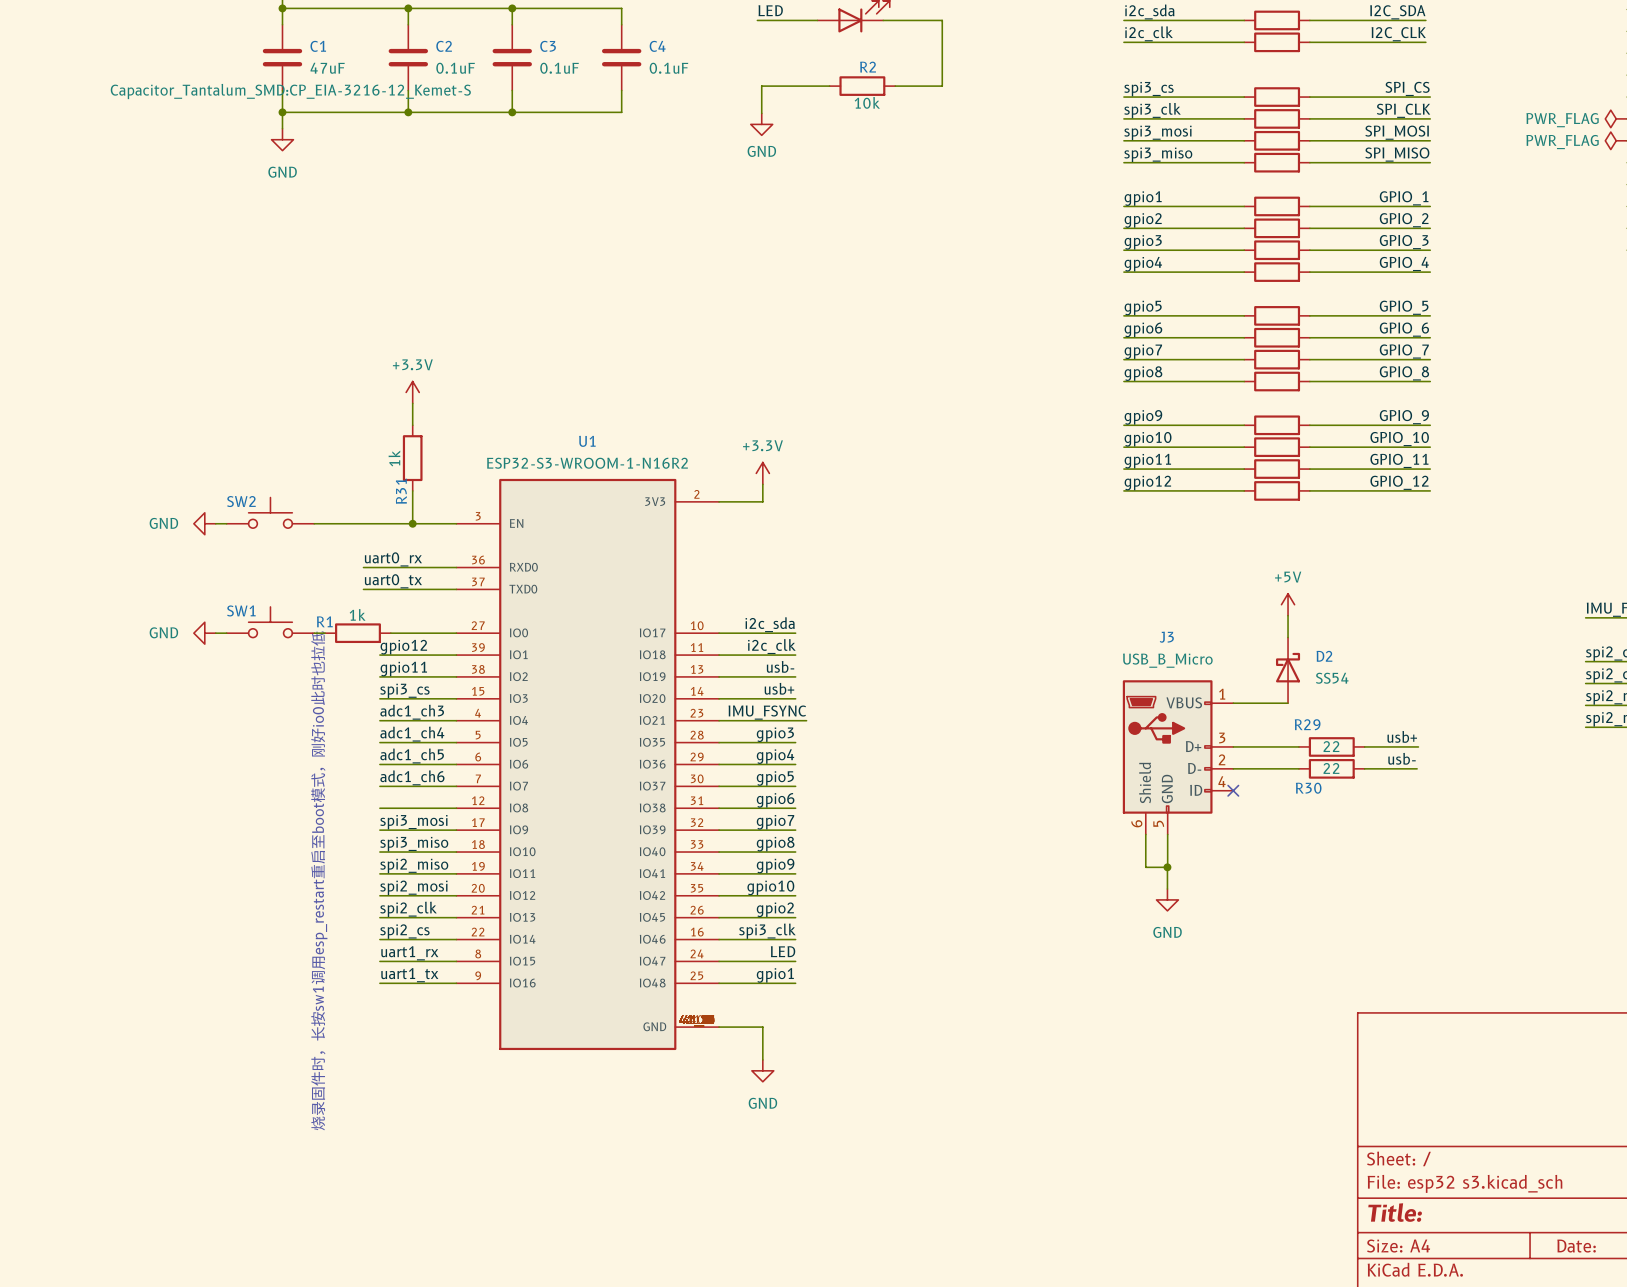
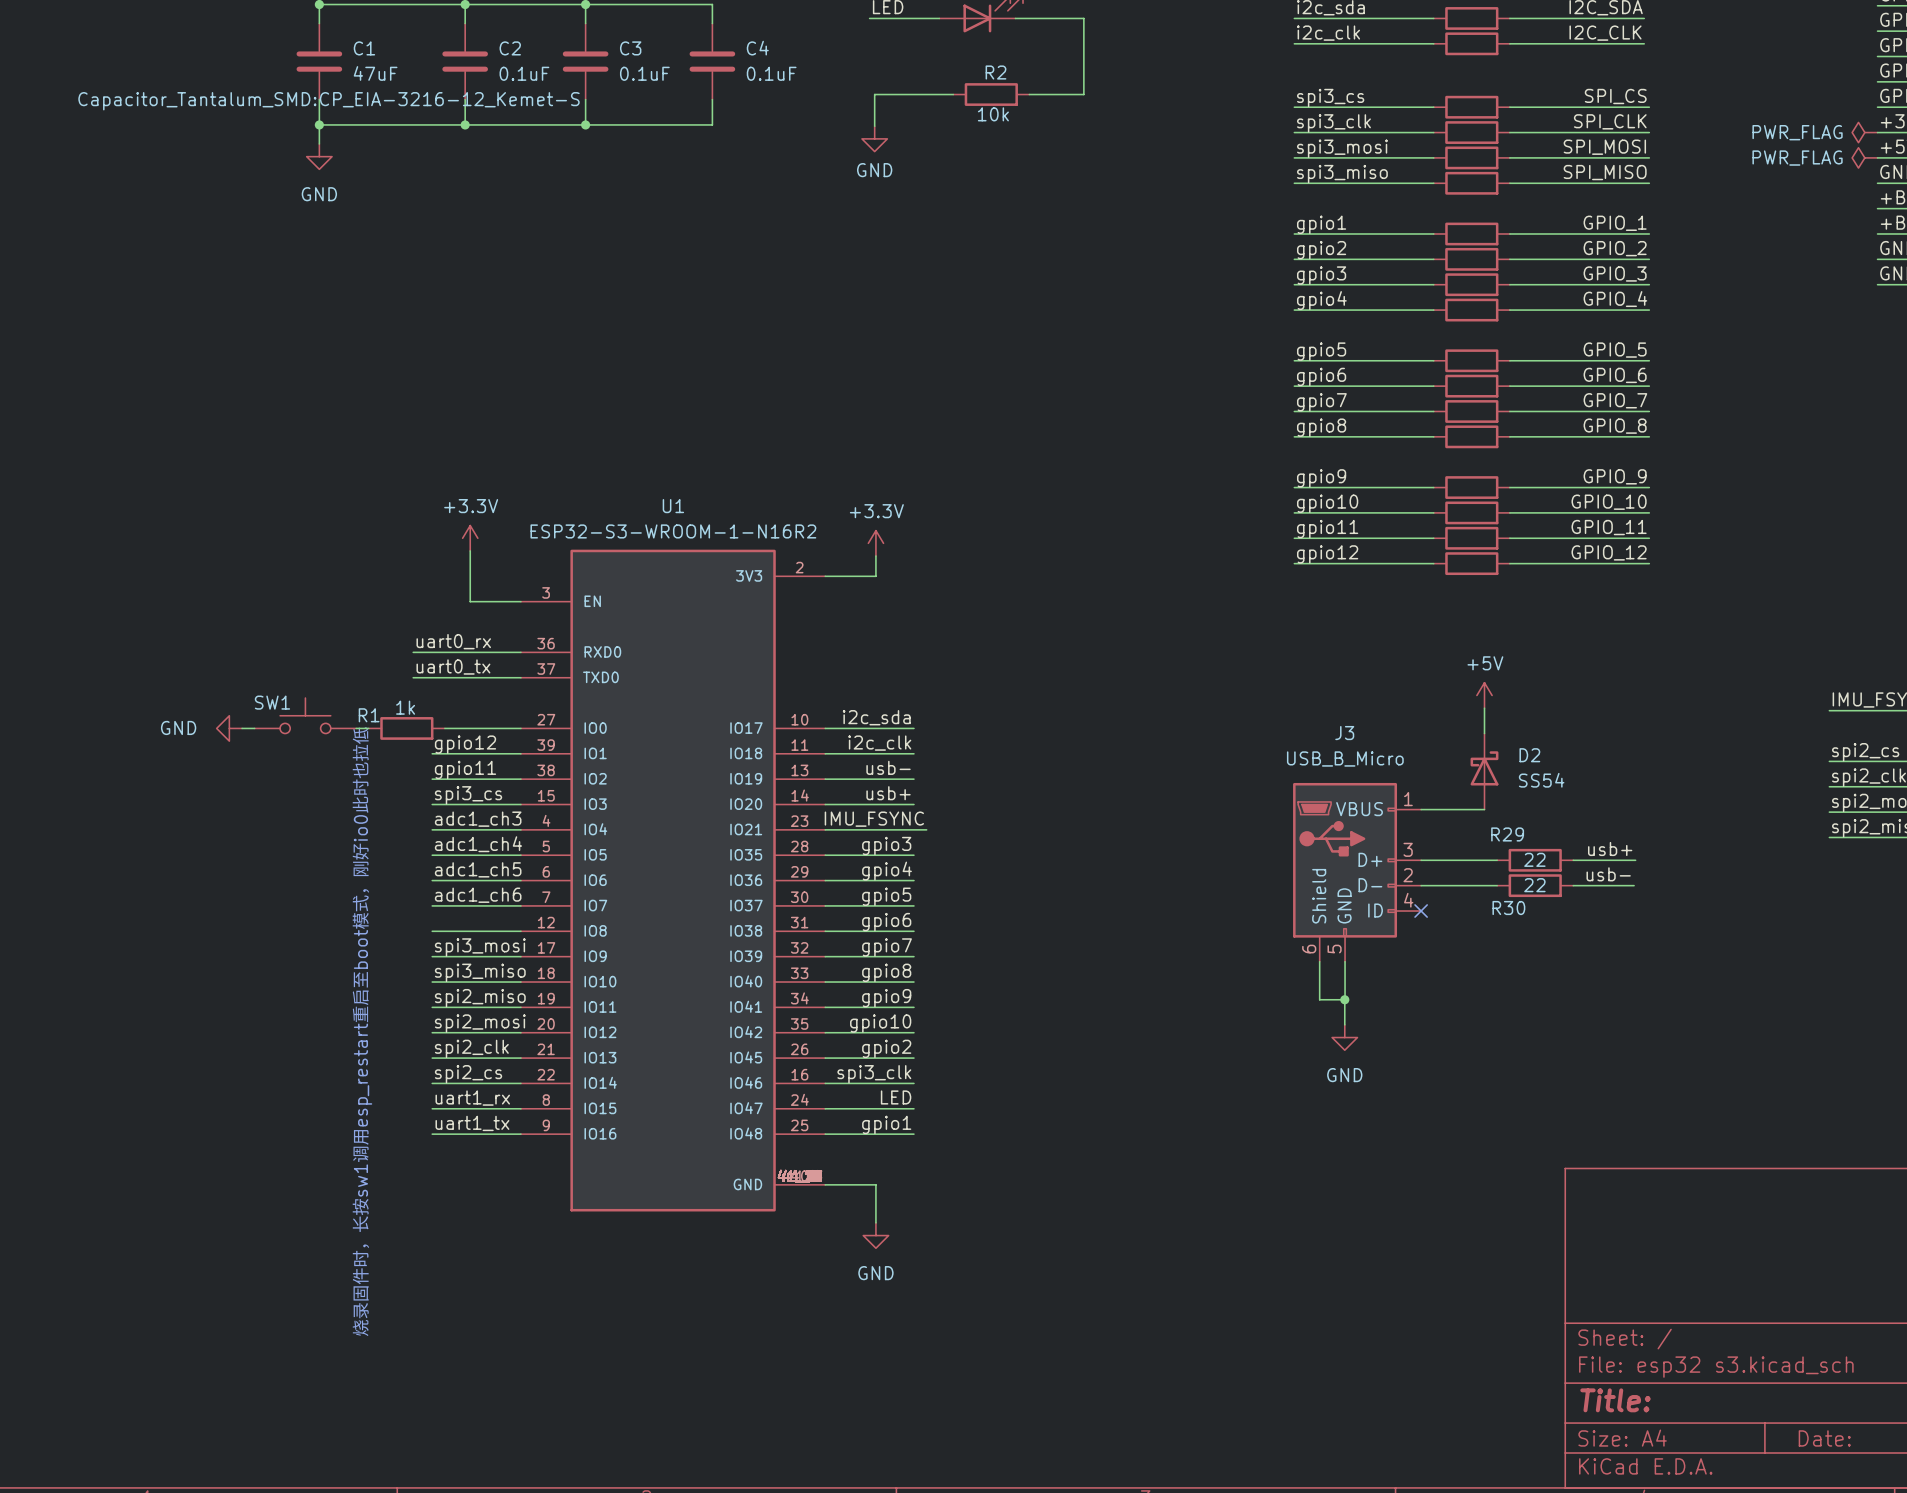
power symbol position: +3.3V (412, 392) -> +3.3V (470, 538)
wire: (412, 403) (412, 425) -> none
R31: 1k (412, 458) -> none
SW2: (270, 512) -> none
power symbol: GND (204, 523) -> none
wire: (215, 523) (226, 523) -> none
wire: (314, 523) (412, 523) -> none
junction: (412, 523) -> none

